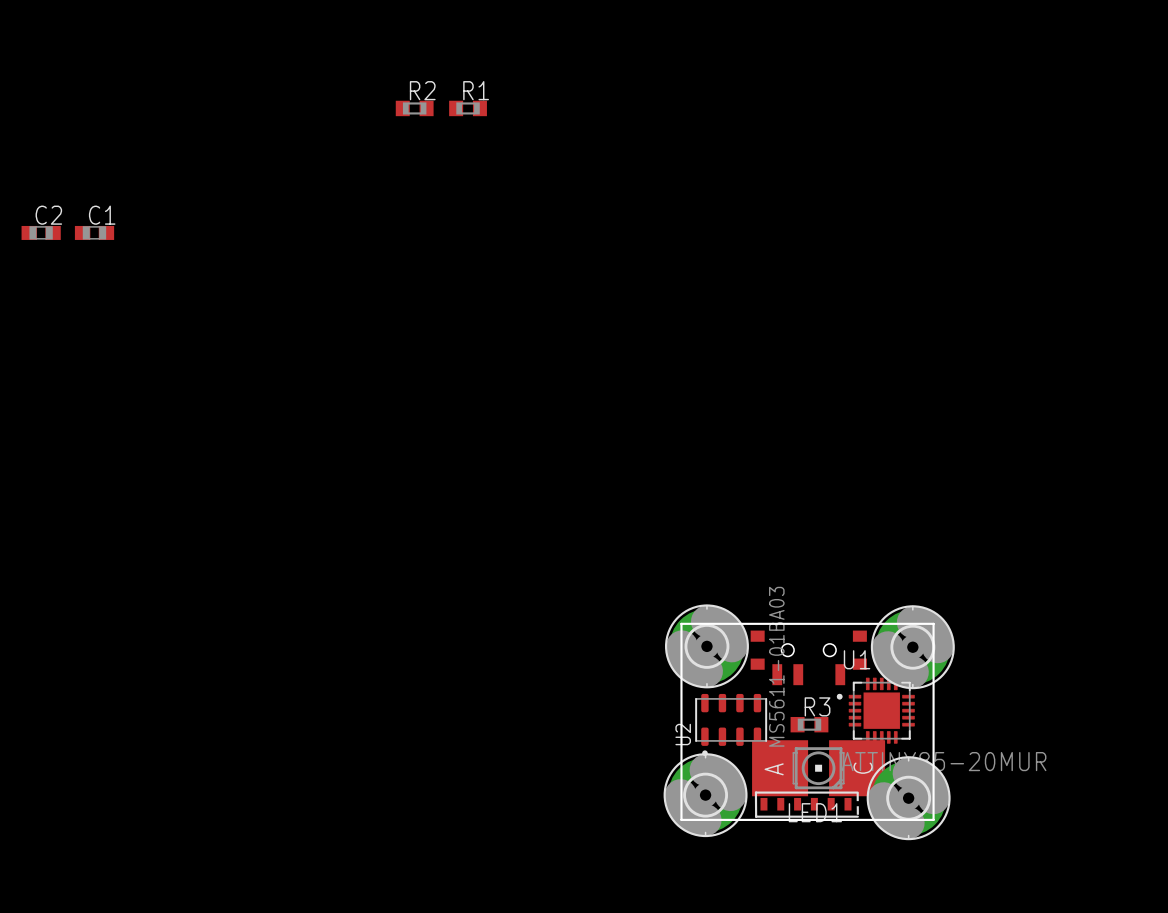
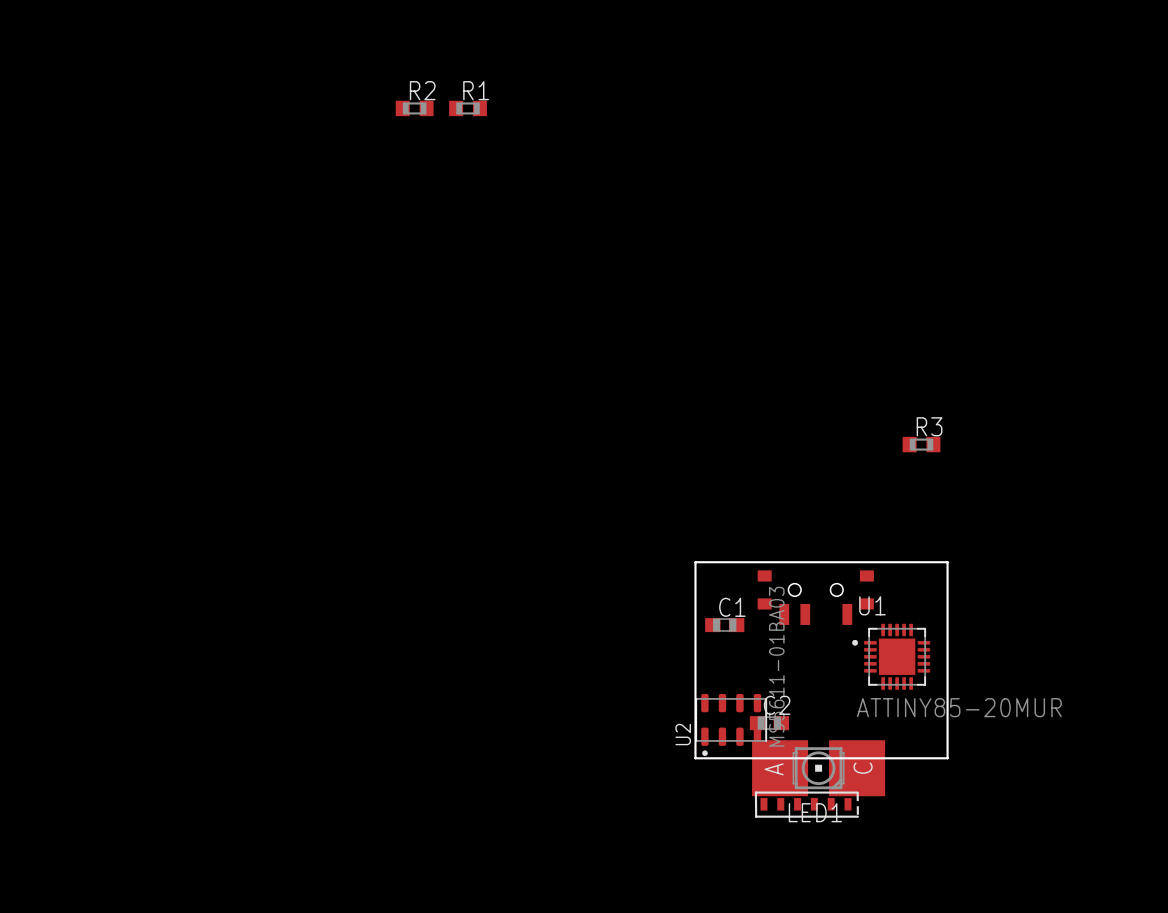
C2 position: (41, 232) -> (769, 723)
C1 position: (94, 232) -> (724, 625)
board edge: (681, 623) (681, 819) (933, 819) (933, 623) (681, 623) -> (695, 562) (695, 758) (947, 758) (947, 562) (695, 562)
part: (706, 646) -> none
part: (912, 647) -> none
part position: (808, 657) -> (815, 597)
U1 position: (875, 710) -> (891, 656)
R3 position: (809, 724) -> (921, 444)
part: (705, 795) -> none
part: (908, 798) -> none

